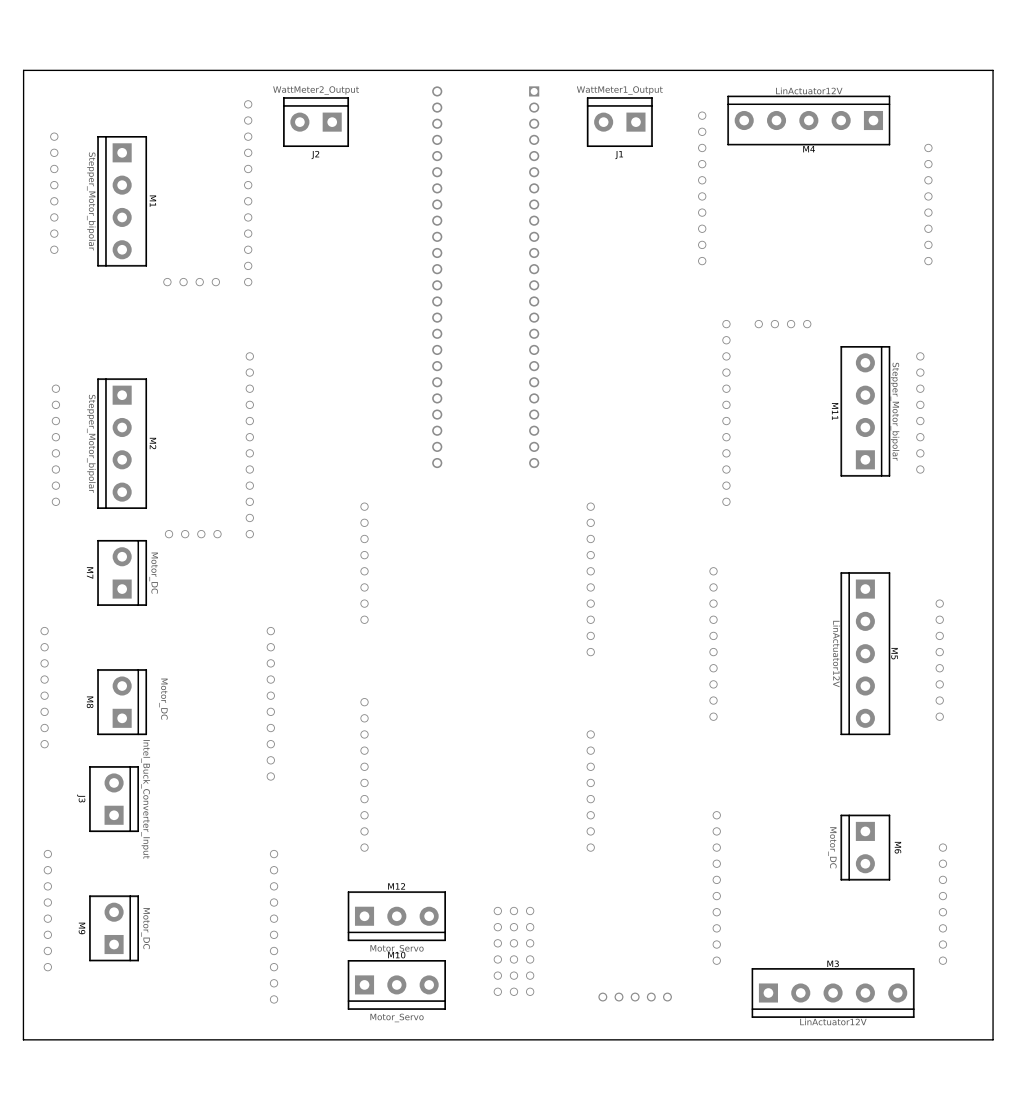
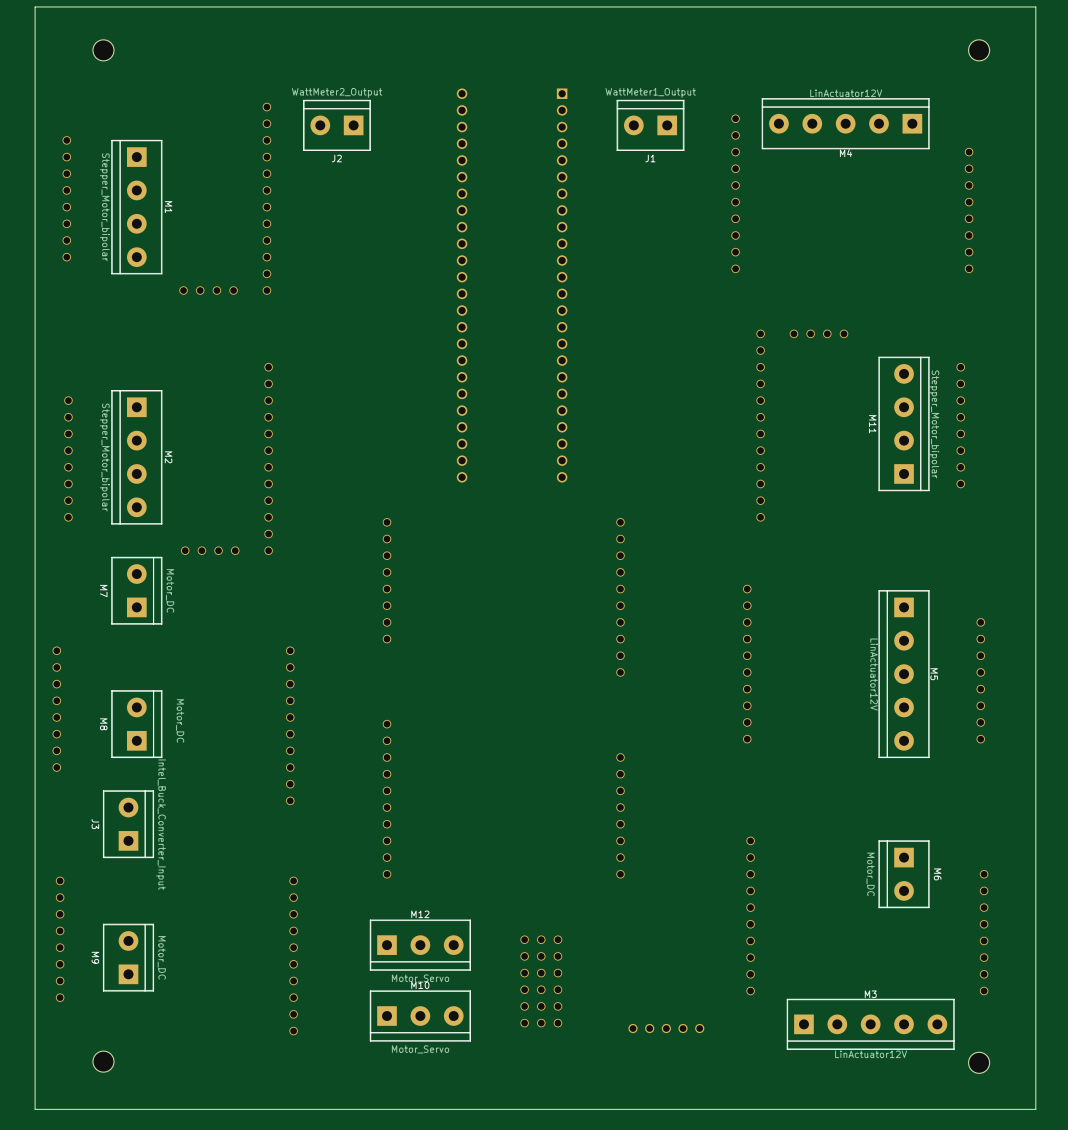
part: none -> (103, 50)
part: none -> (979, 50)
board edge: (993, 70) (23, 70) (23, 1039) (993, 1039) -> (1035, 71) (1035, 6) (35, 6) (35, 1109) (1035, 1109) (1035, 1072)
part: none -> (103, 1061)
part: none -> (979, 1062)

